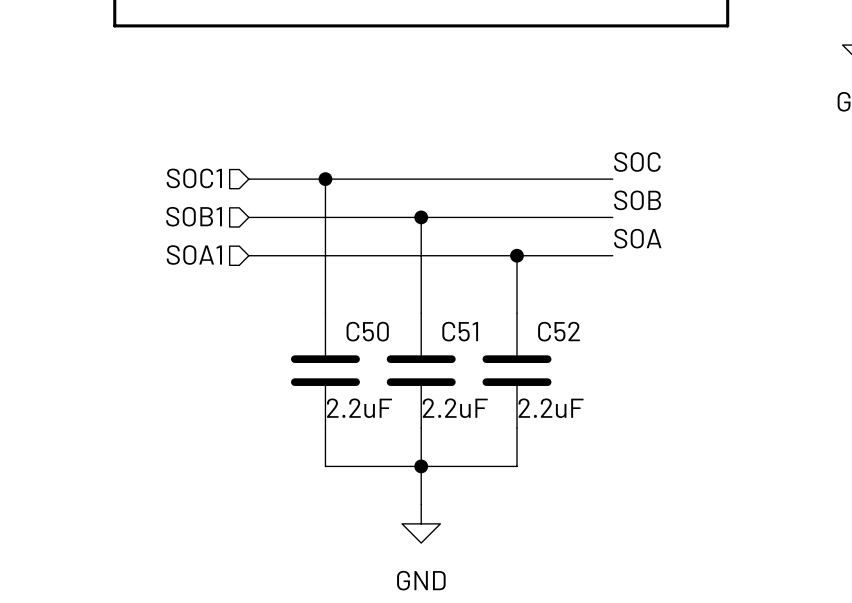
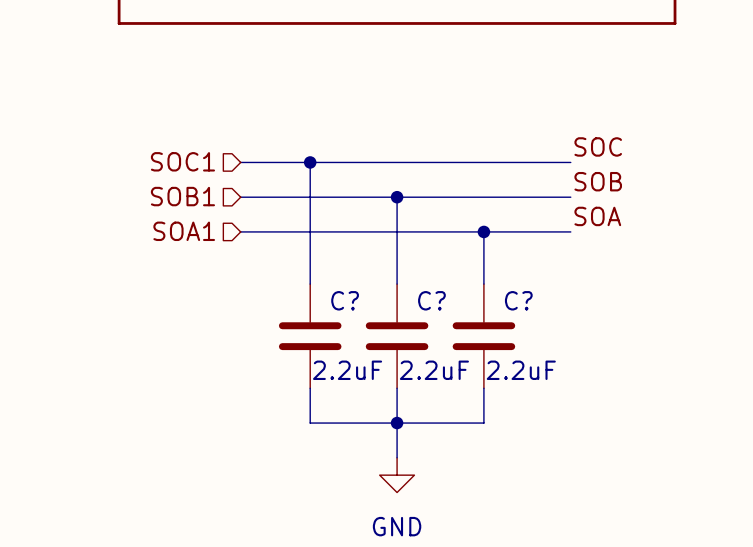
C50 name: C50 (367, 331) -> C? (345, 300)
C51 name: C51 (460, 331) -> C? (431, 300)
C52 name: C52 (559, 331) -> C? (518, 300)

